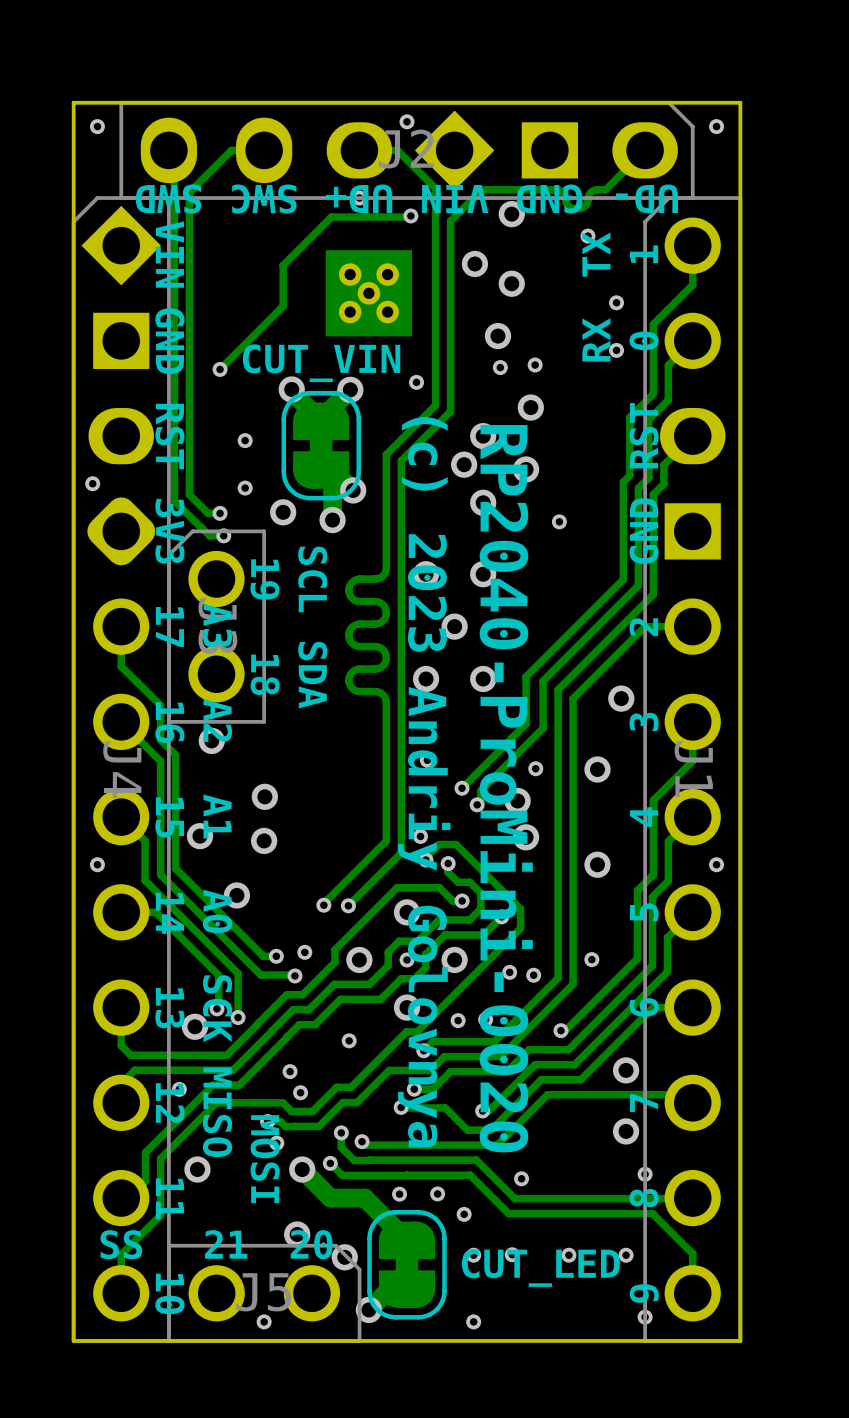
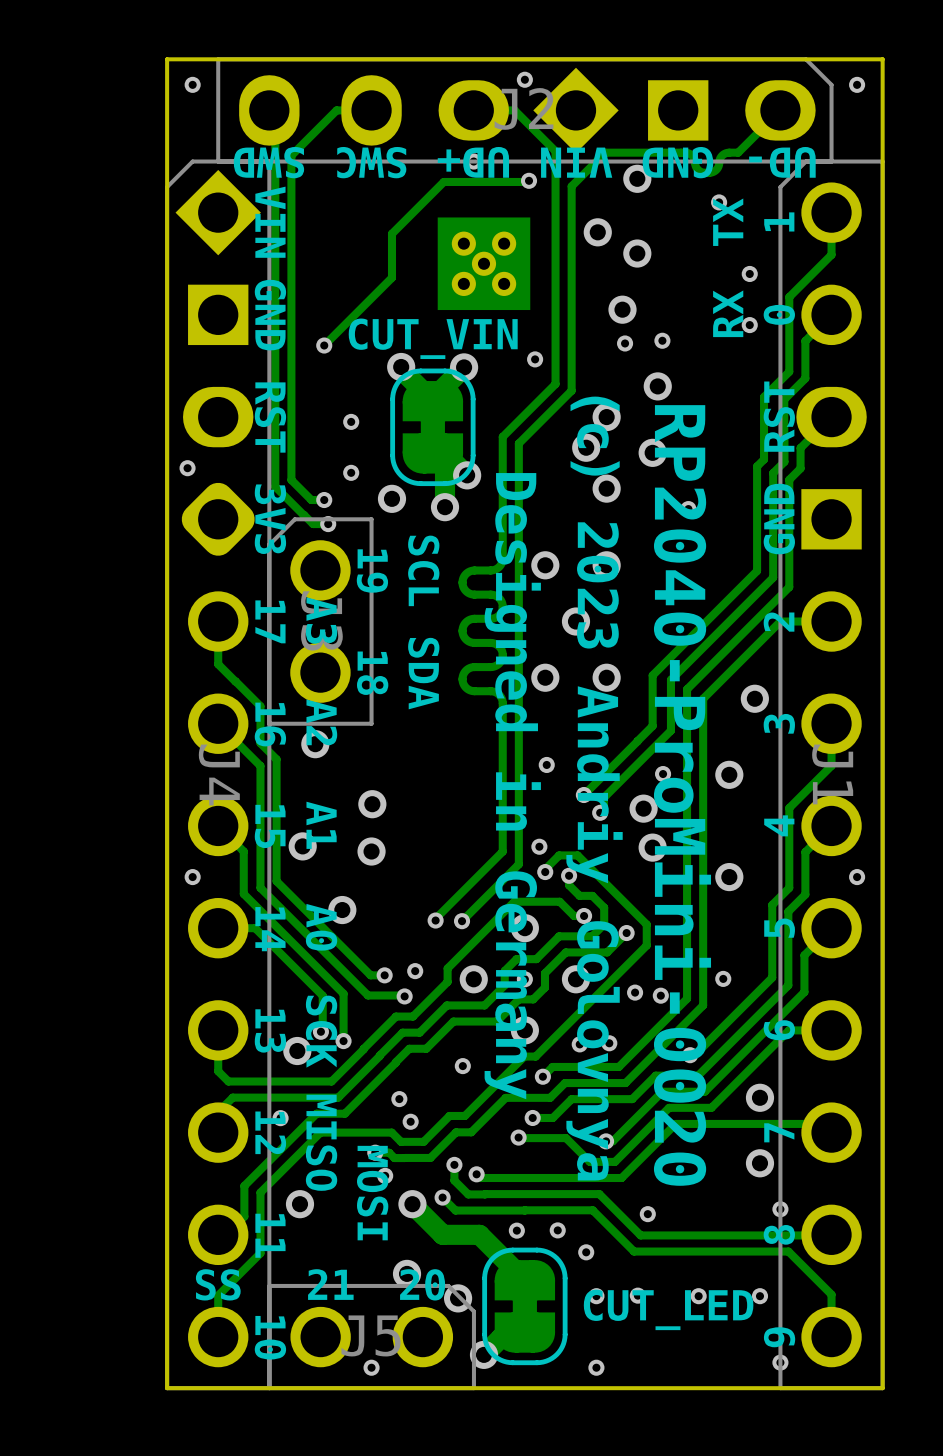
text: none -> Designed in Germany (512, 786)
text position: (c) 2023 Andriy Golovnya (424, 782) -> (c) 2023 Andriy Golovnya (594, 788)
text position: RP2040-ProMini-0020 (506, 788) -> RP2040-ProMini-0020 (682, 795)

